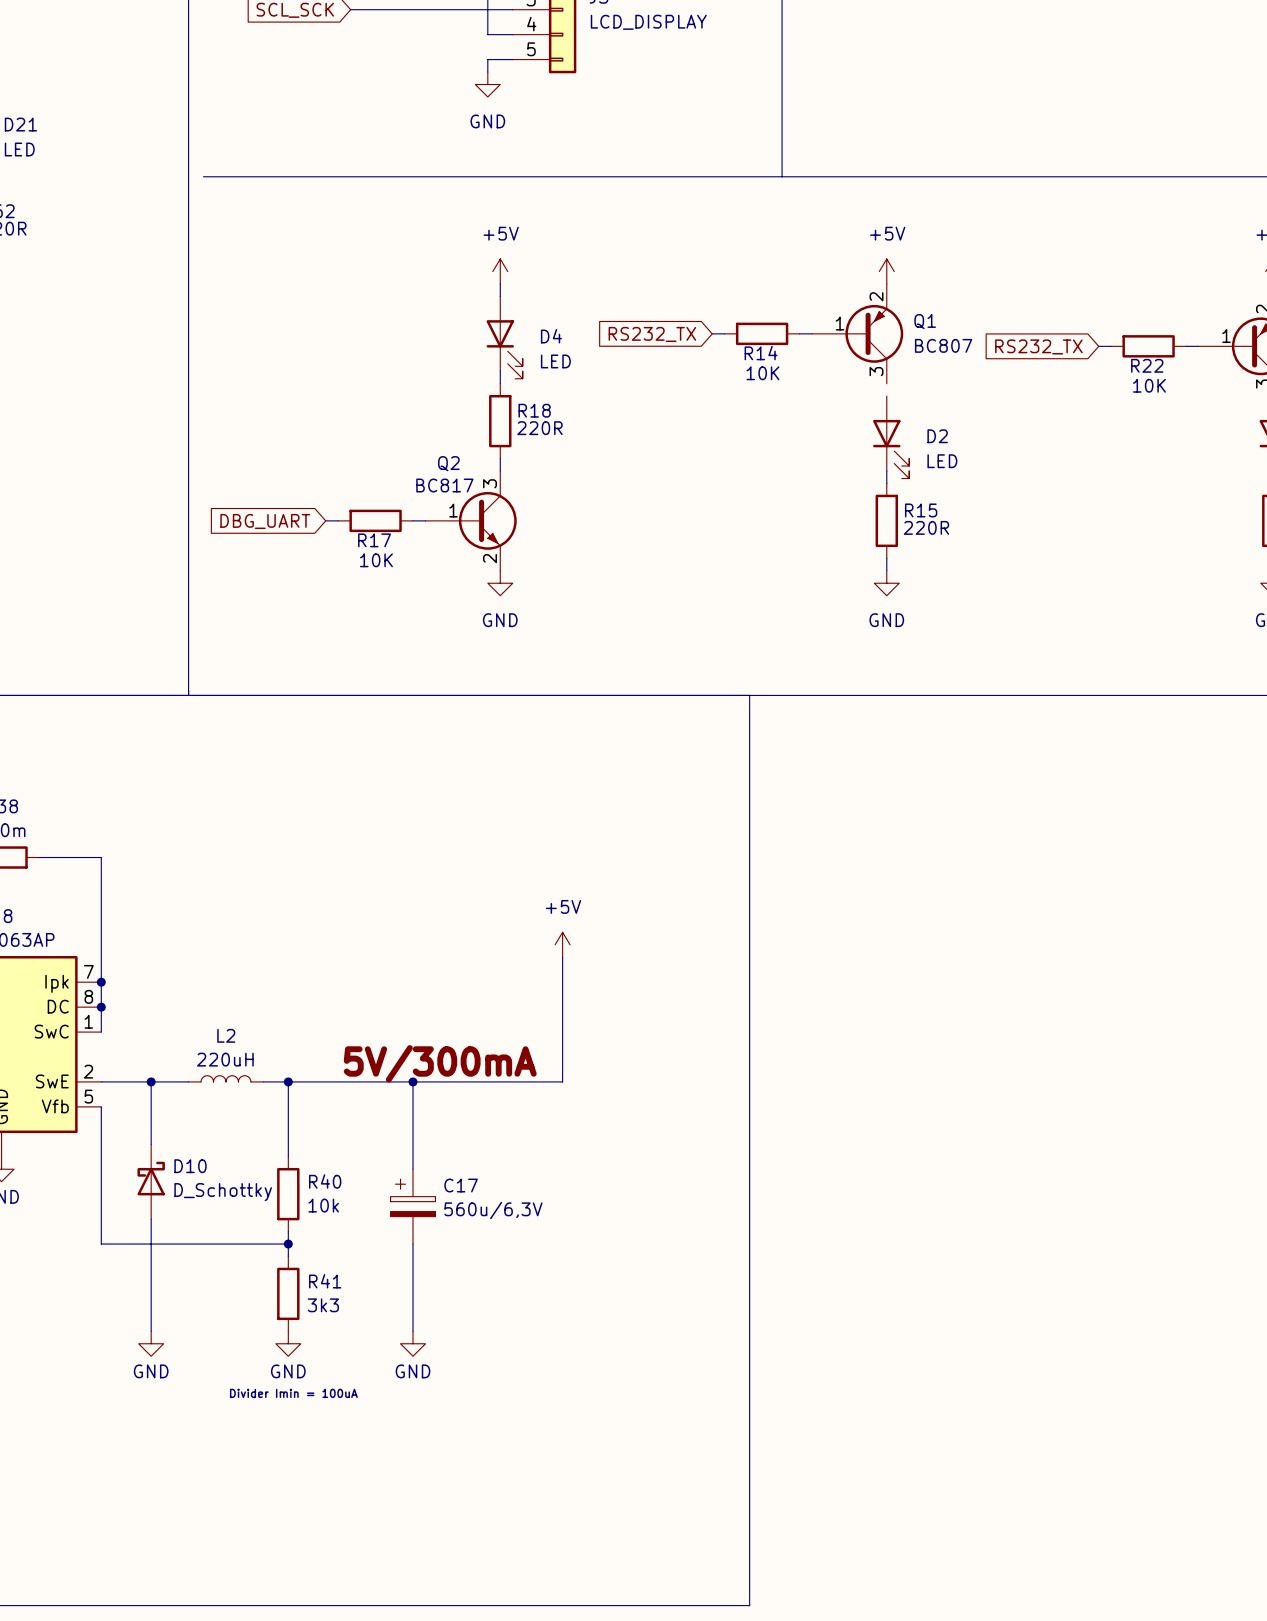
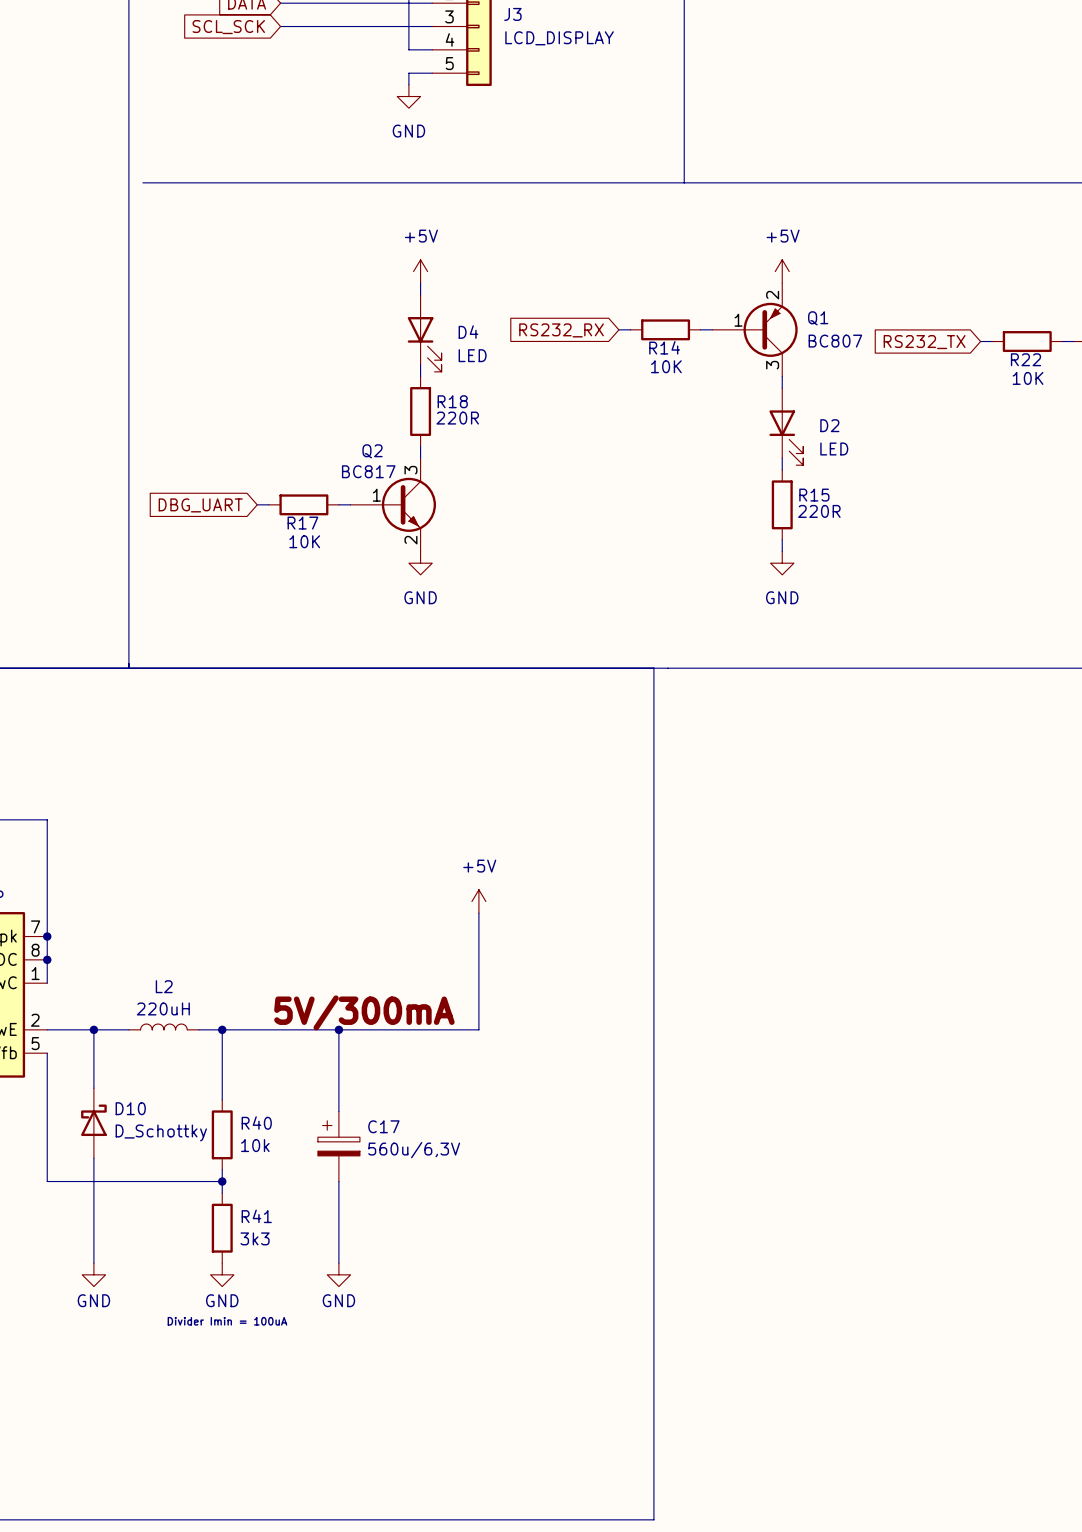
global label: RS232_TX (652, 334) -> RS232_RX (561, 330)
wire: none -> (782, 376) (782, 388)

